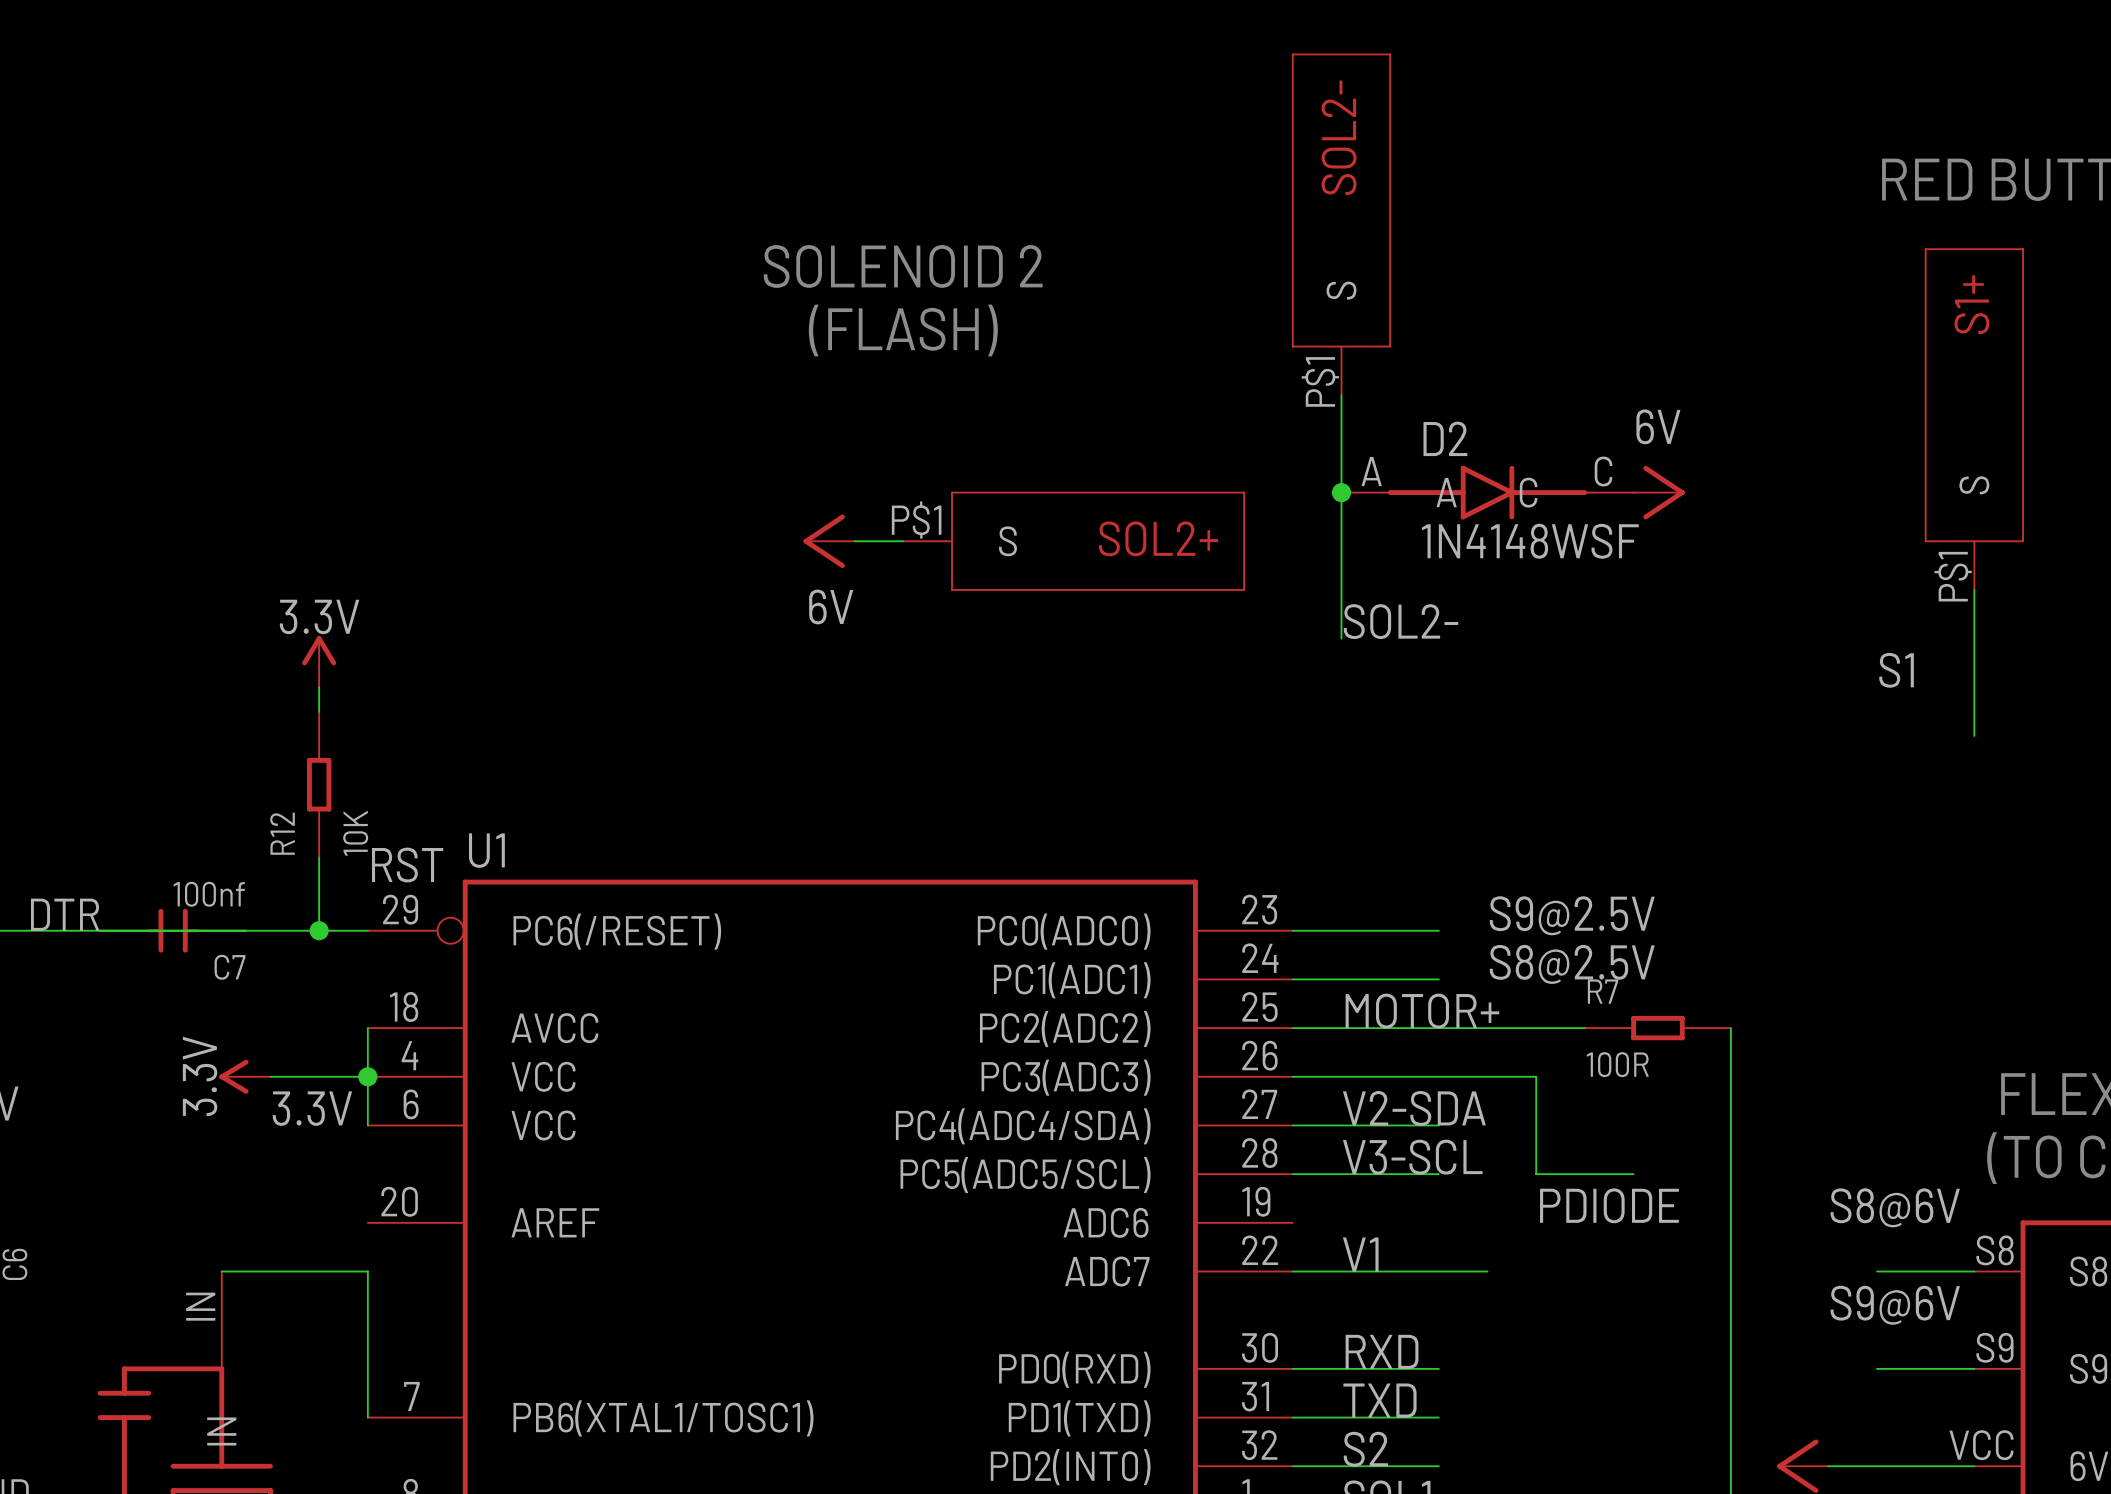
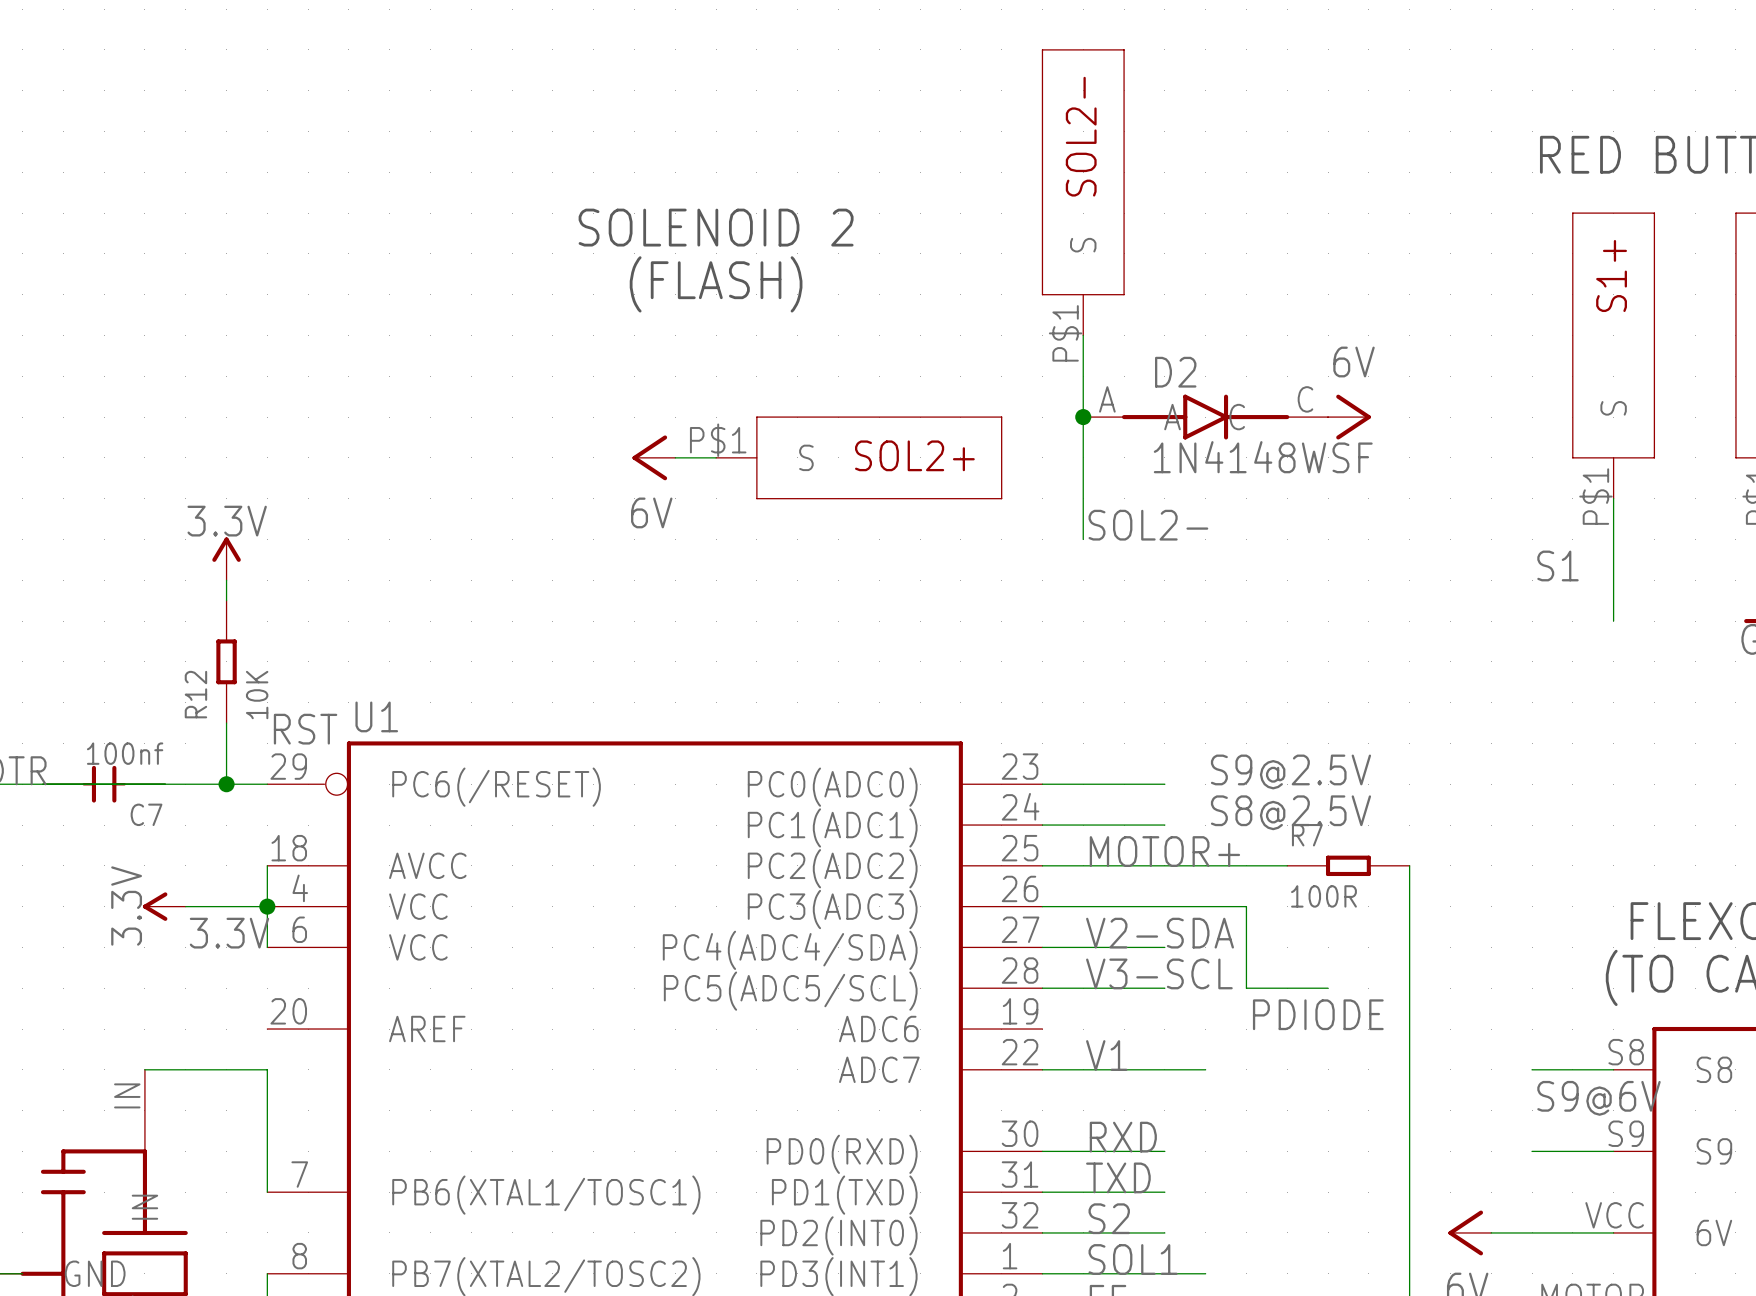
label: S8@6V (1895, 1207) -> none
label position: S9@6V (1895, 1305) -> S9@6V (1598, 1098)

